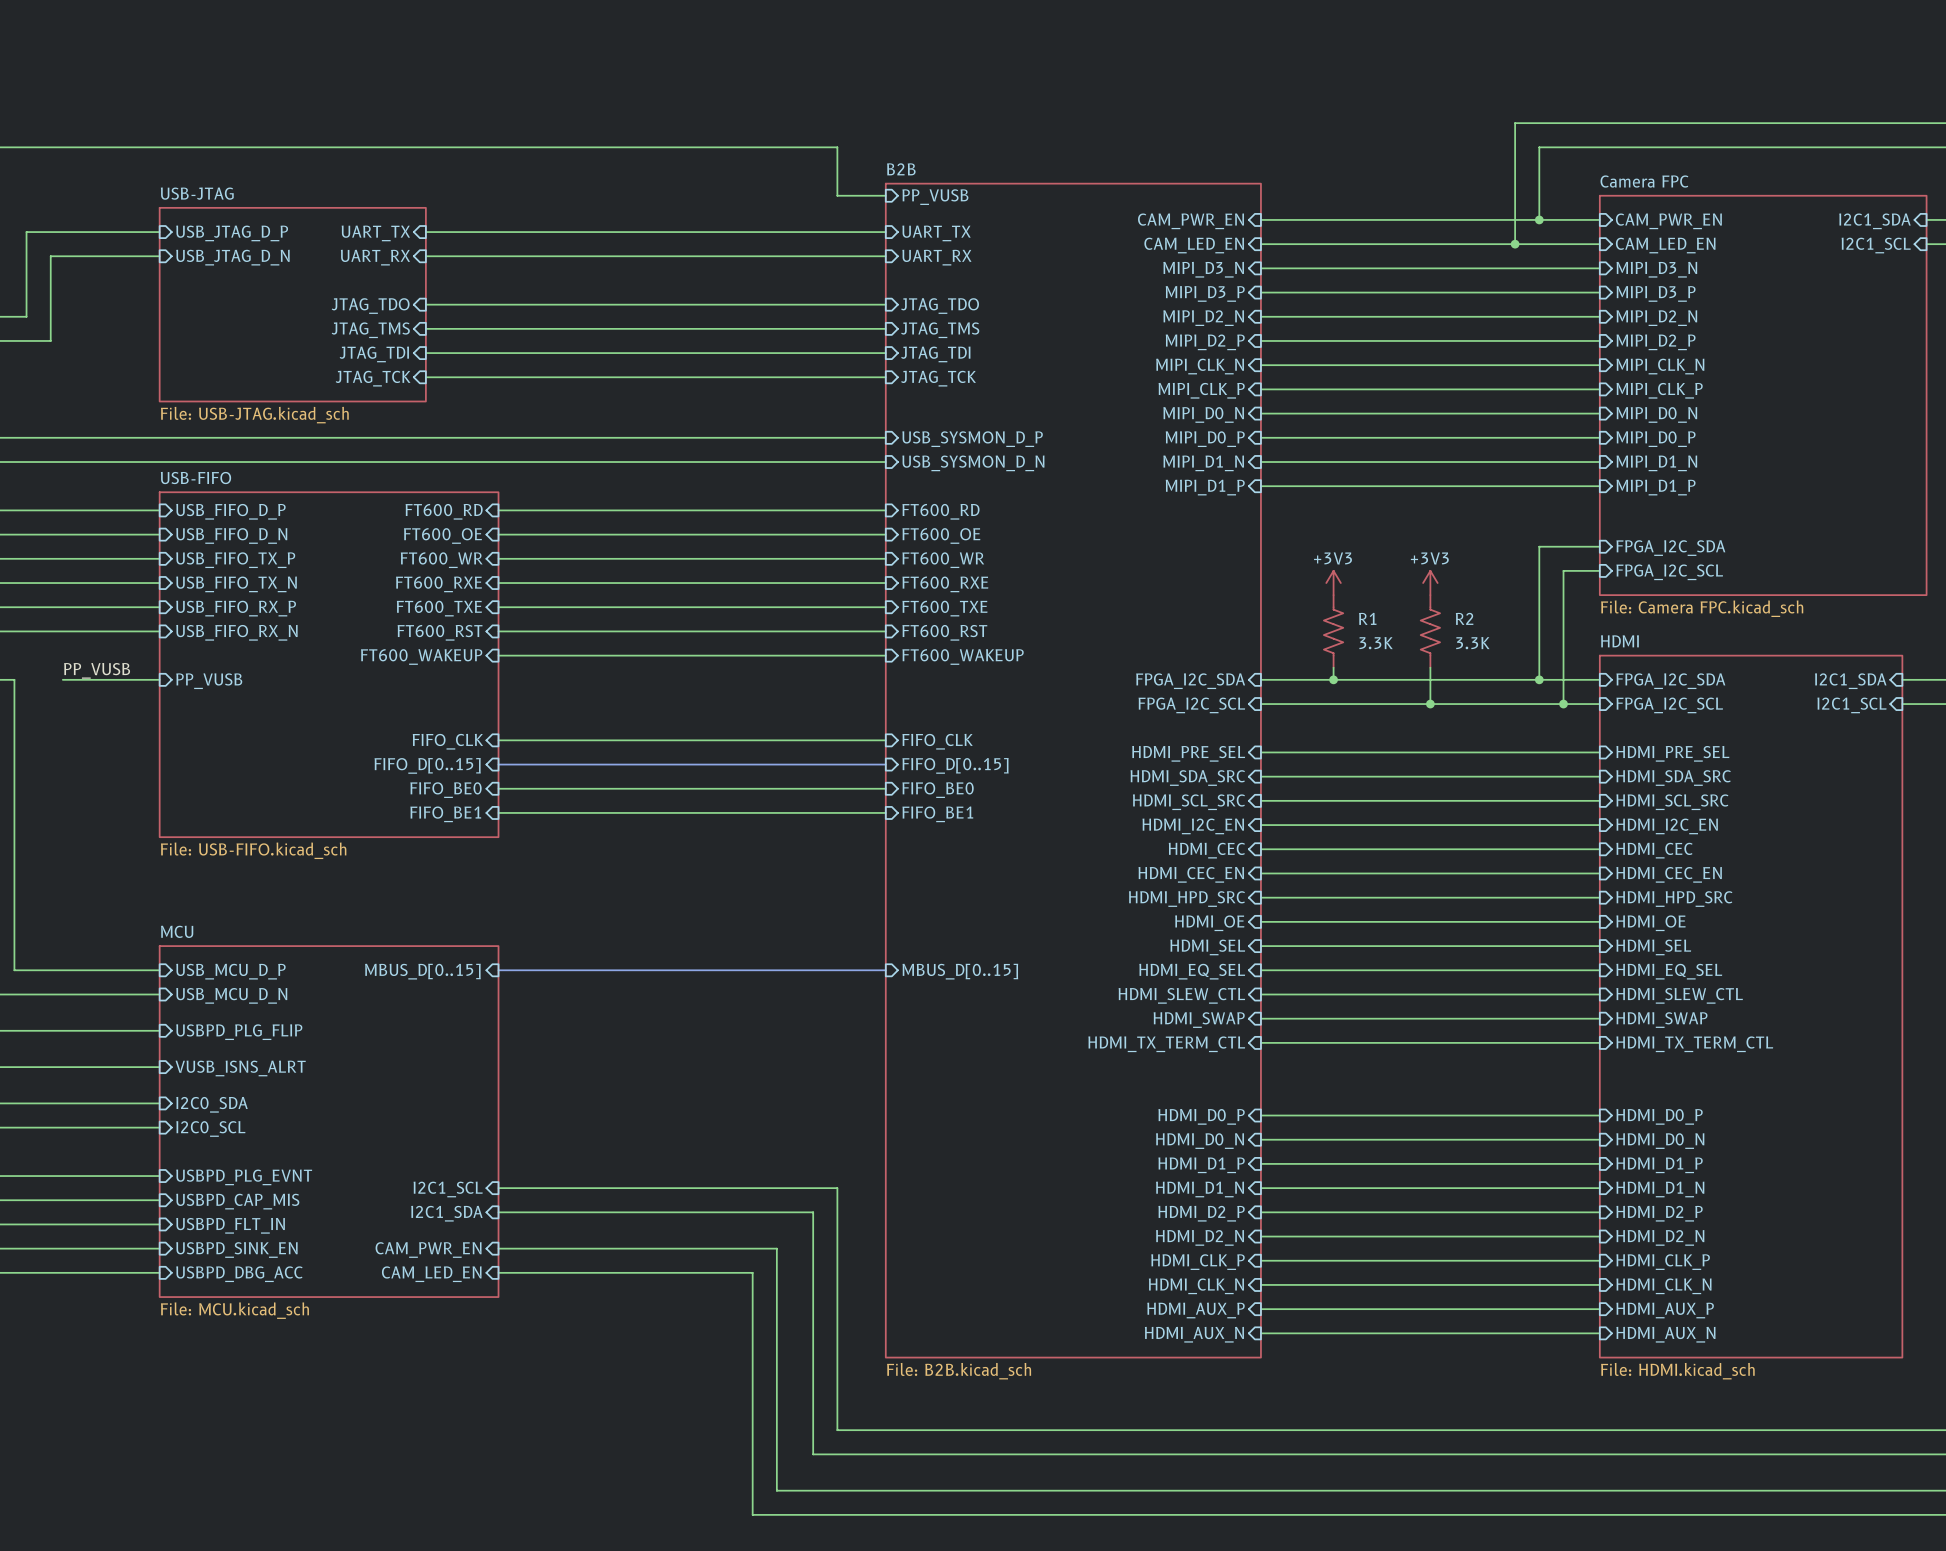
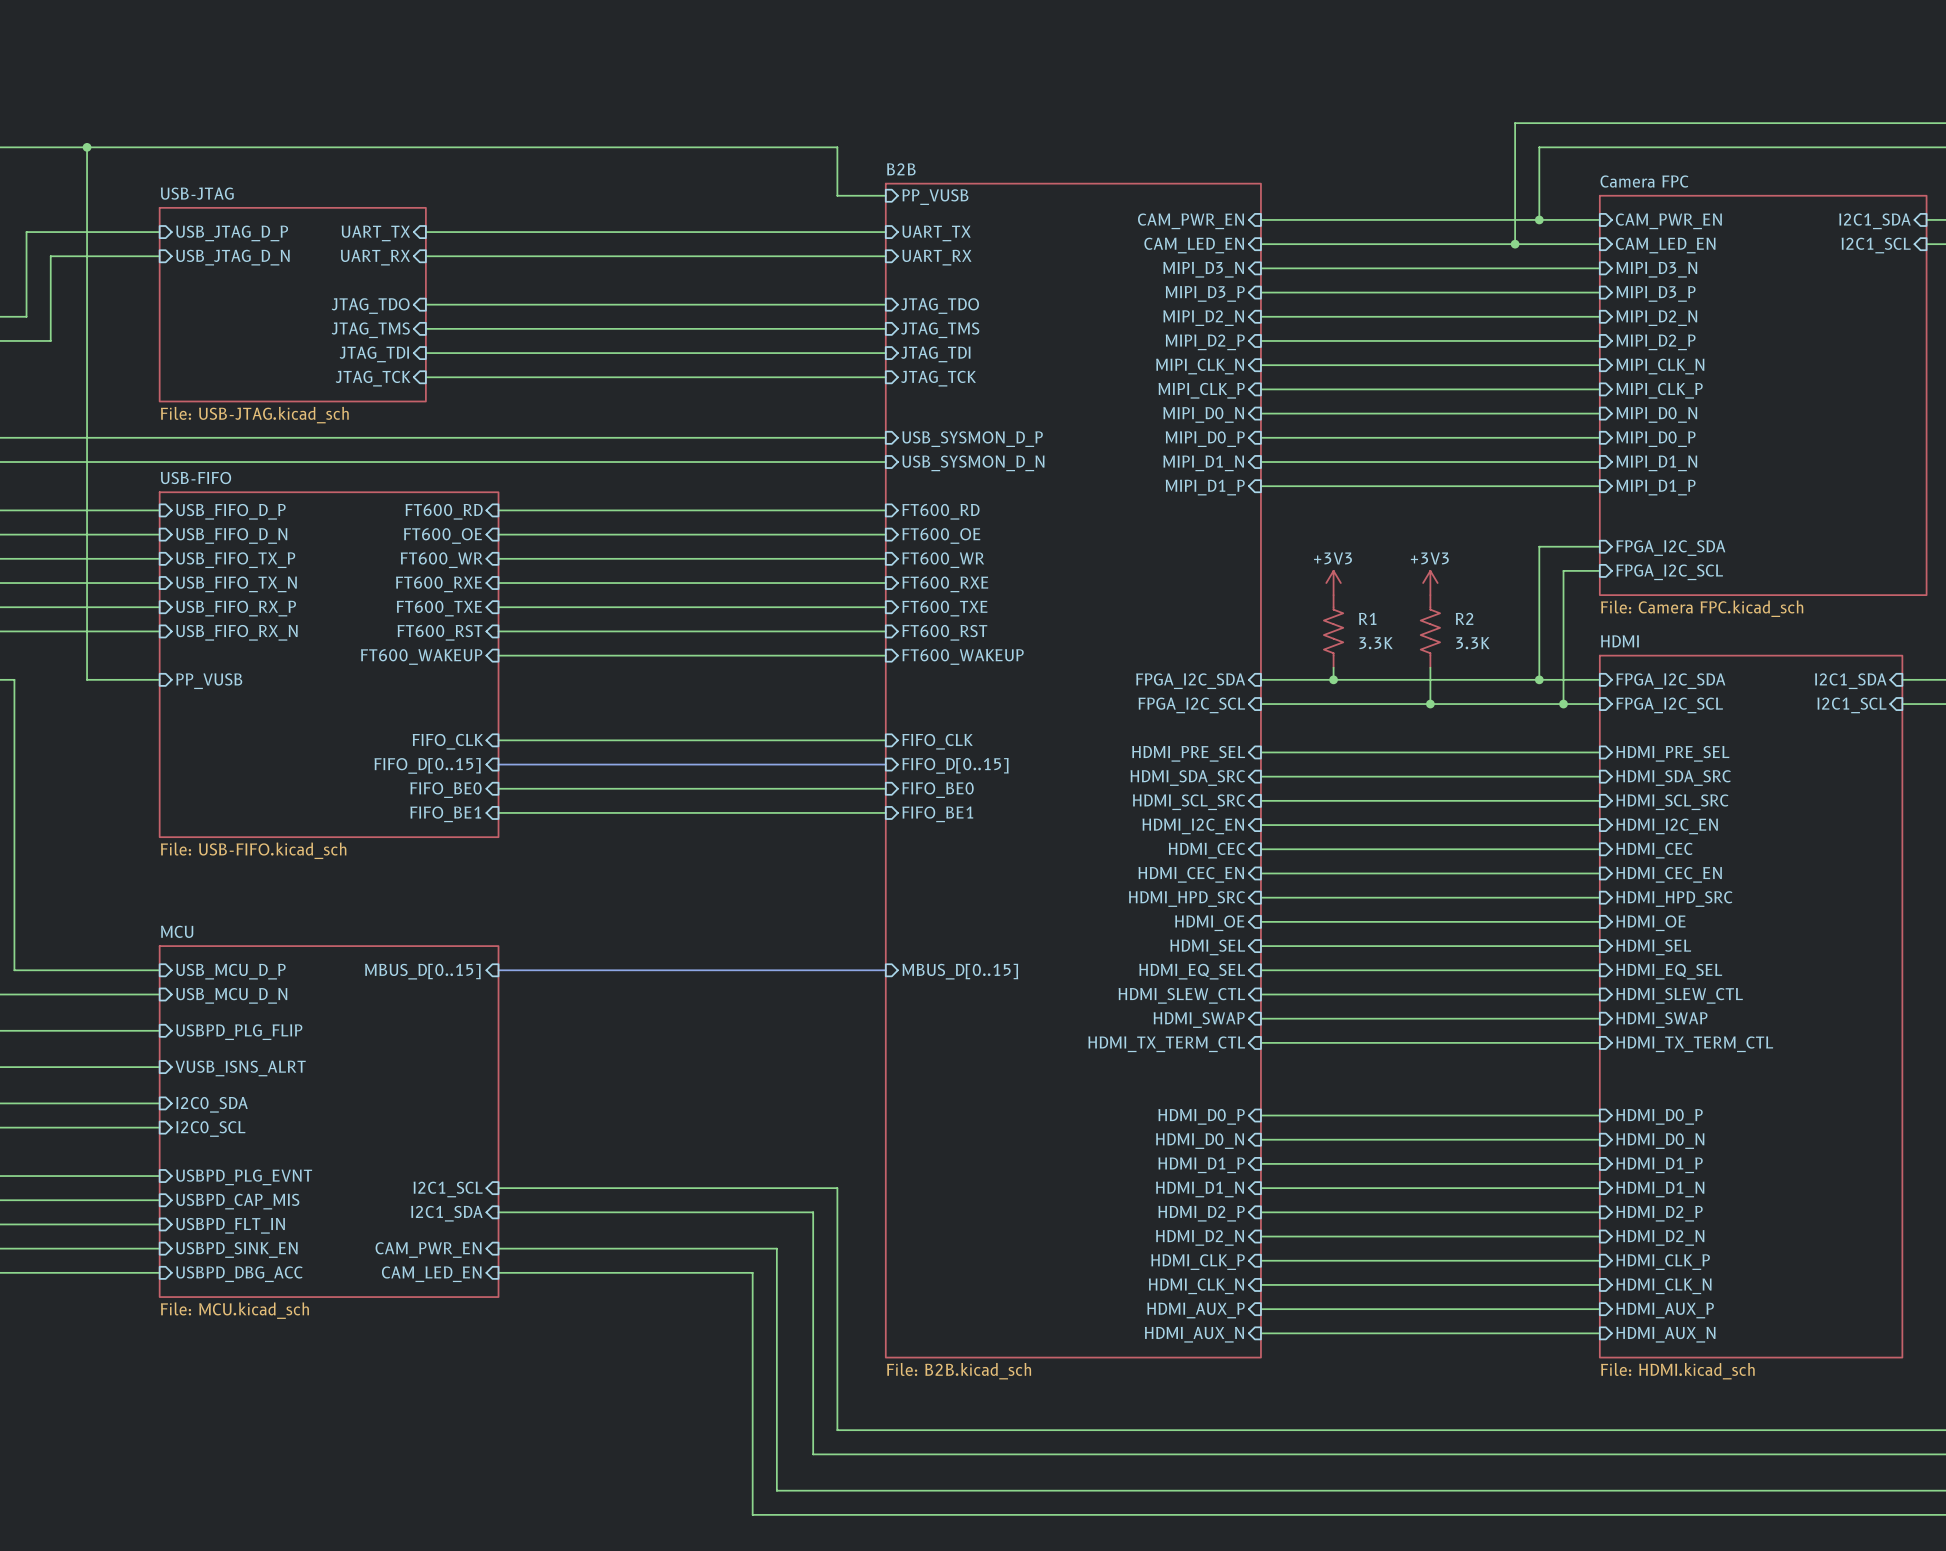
junction: none -> (87, 147)
label: PP_VUSB (97, 670) -> none
wire: (62, 679) (87, 679) -> (87, 147) (87, 679)

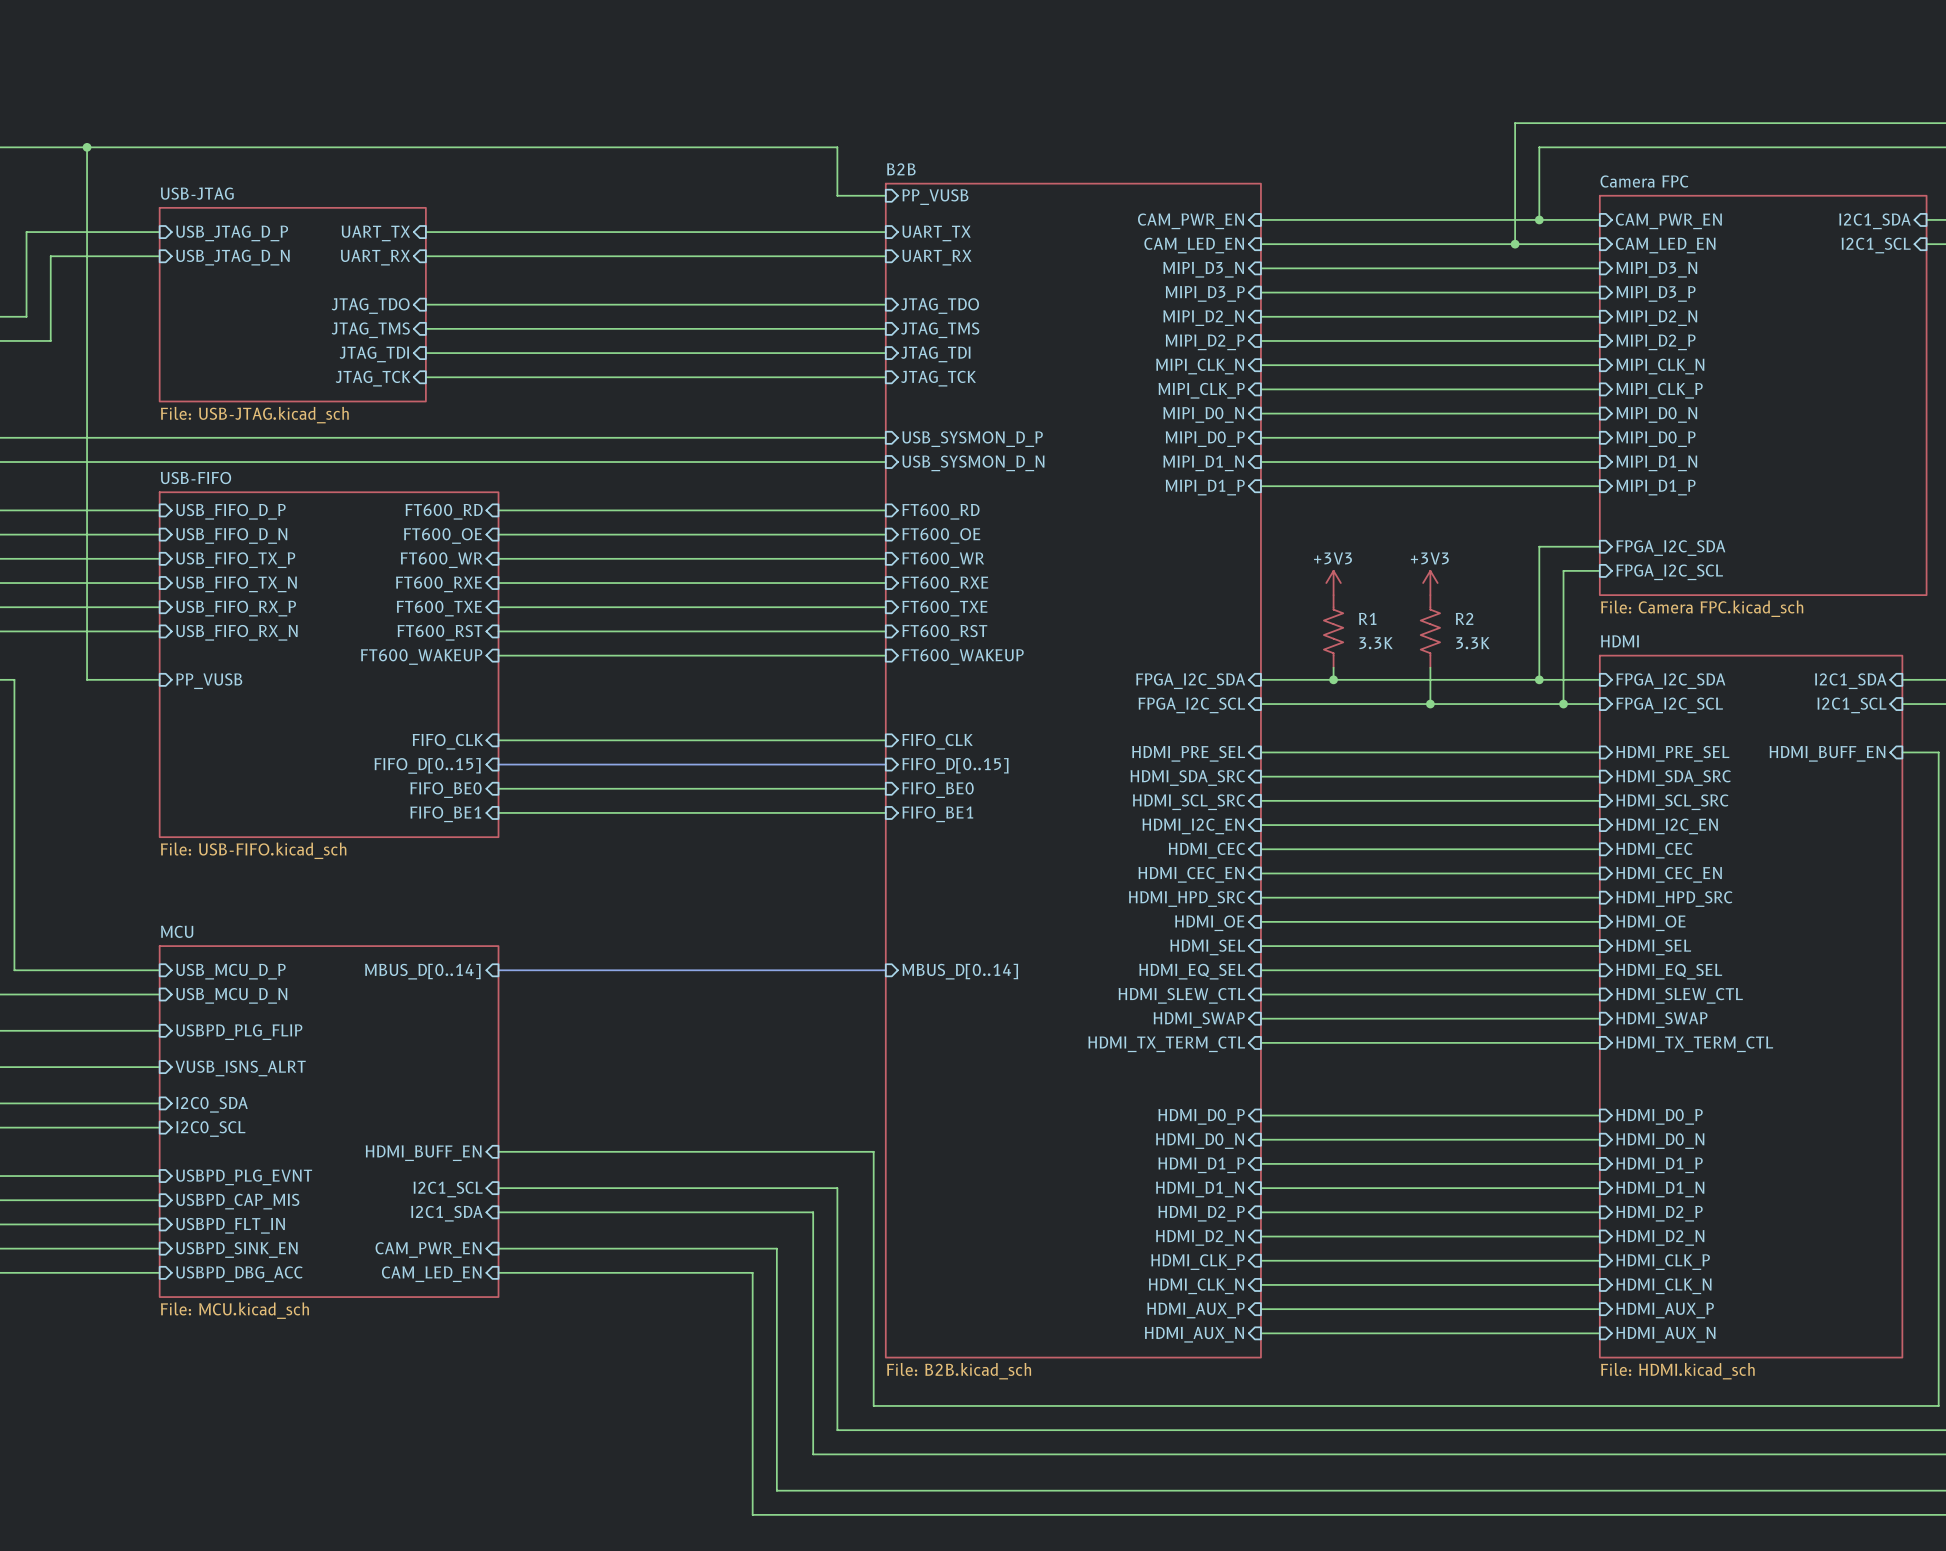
wire: none -> (1902, 752) (1938, 752) (1938, 1405) (873, 1405) (873, 1151) (498, 1151)
sheet pin: none -> HDMI_BUFF_EN (1827, 753)
sheet pin: MBUS_D[0..15] (422, 971) -> MBUS_D[0..14] (422, 971)
sheet pin: MBUS_D[0..15] (960, 971) -> MBUS_D[0..14] (960, 971)
sheet pin: none -> HDMI_BUFF_EN (423, 1153)

